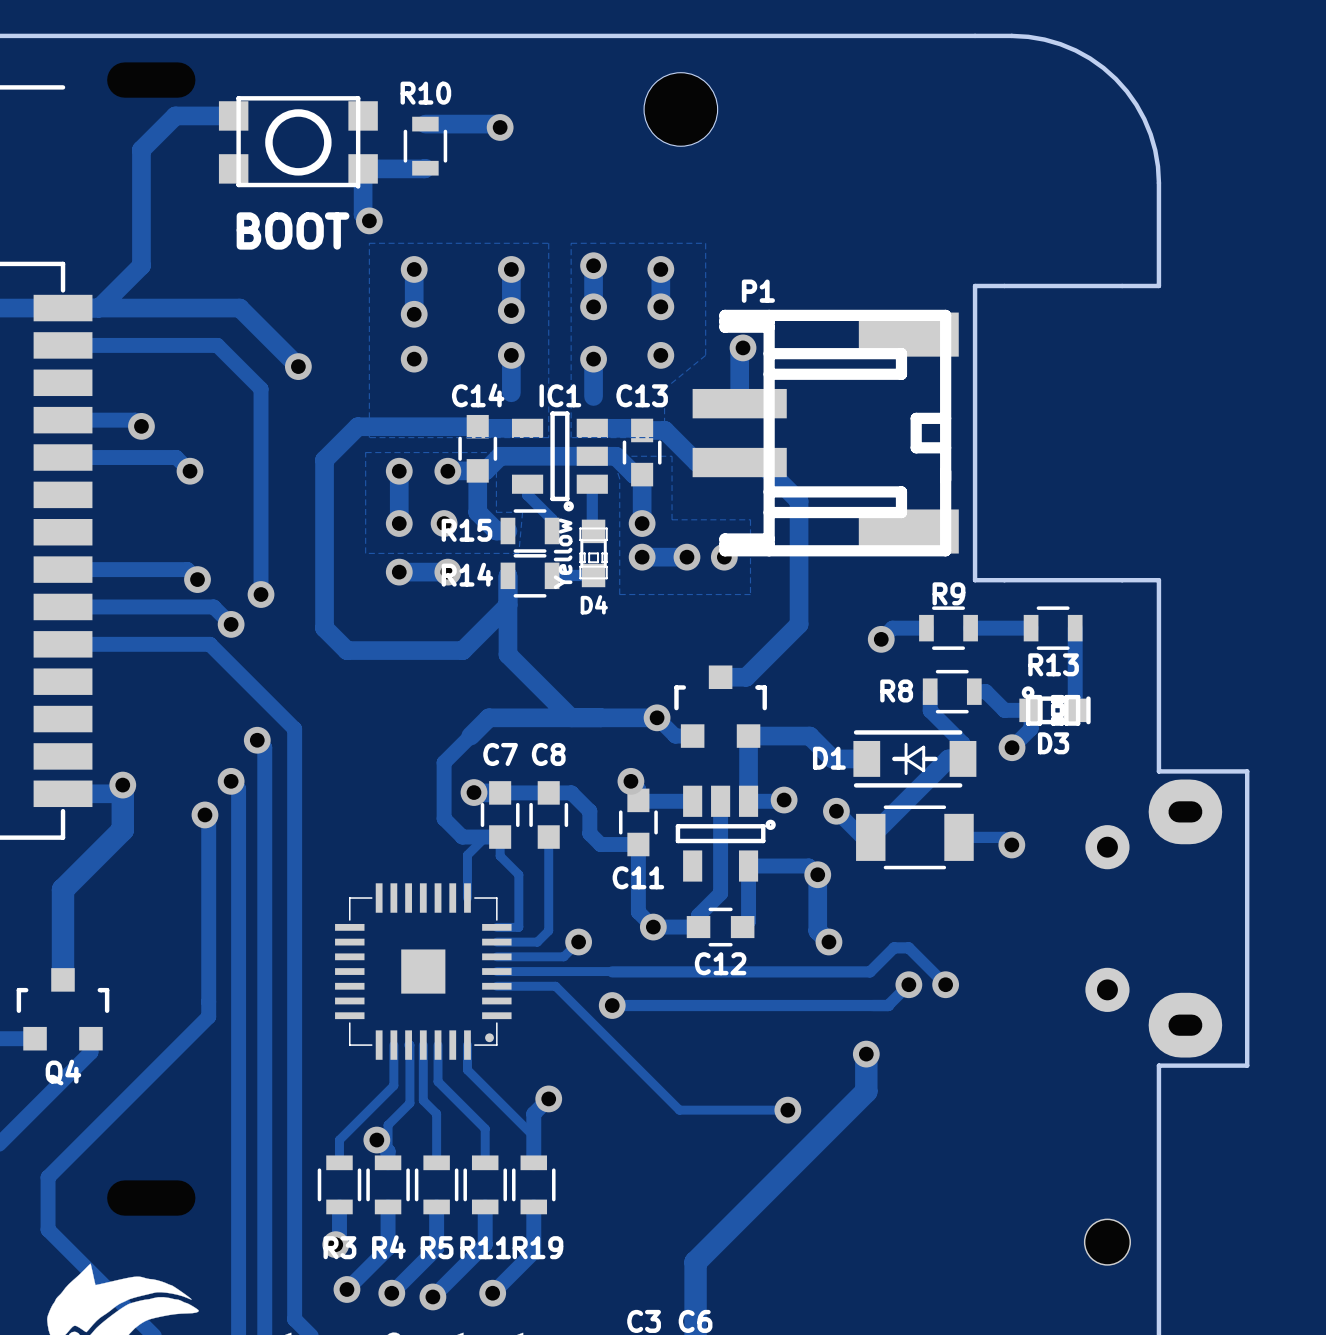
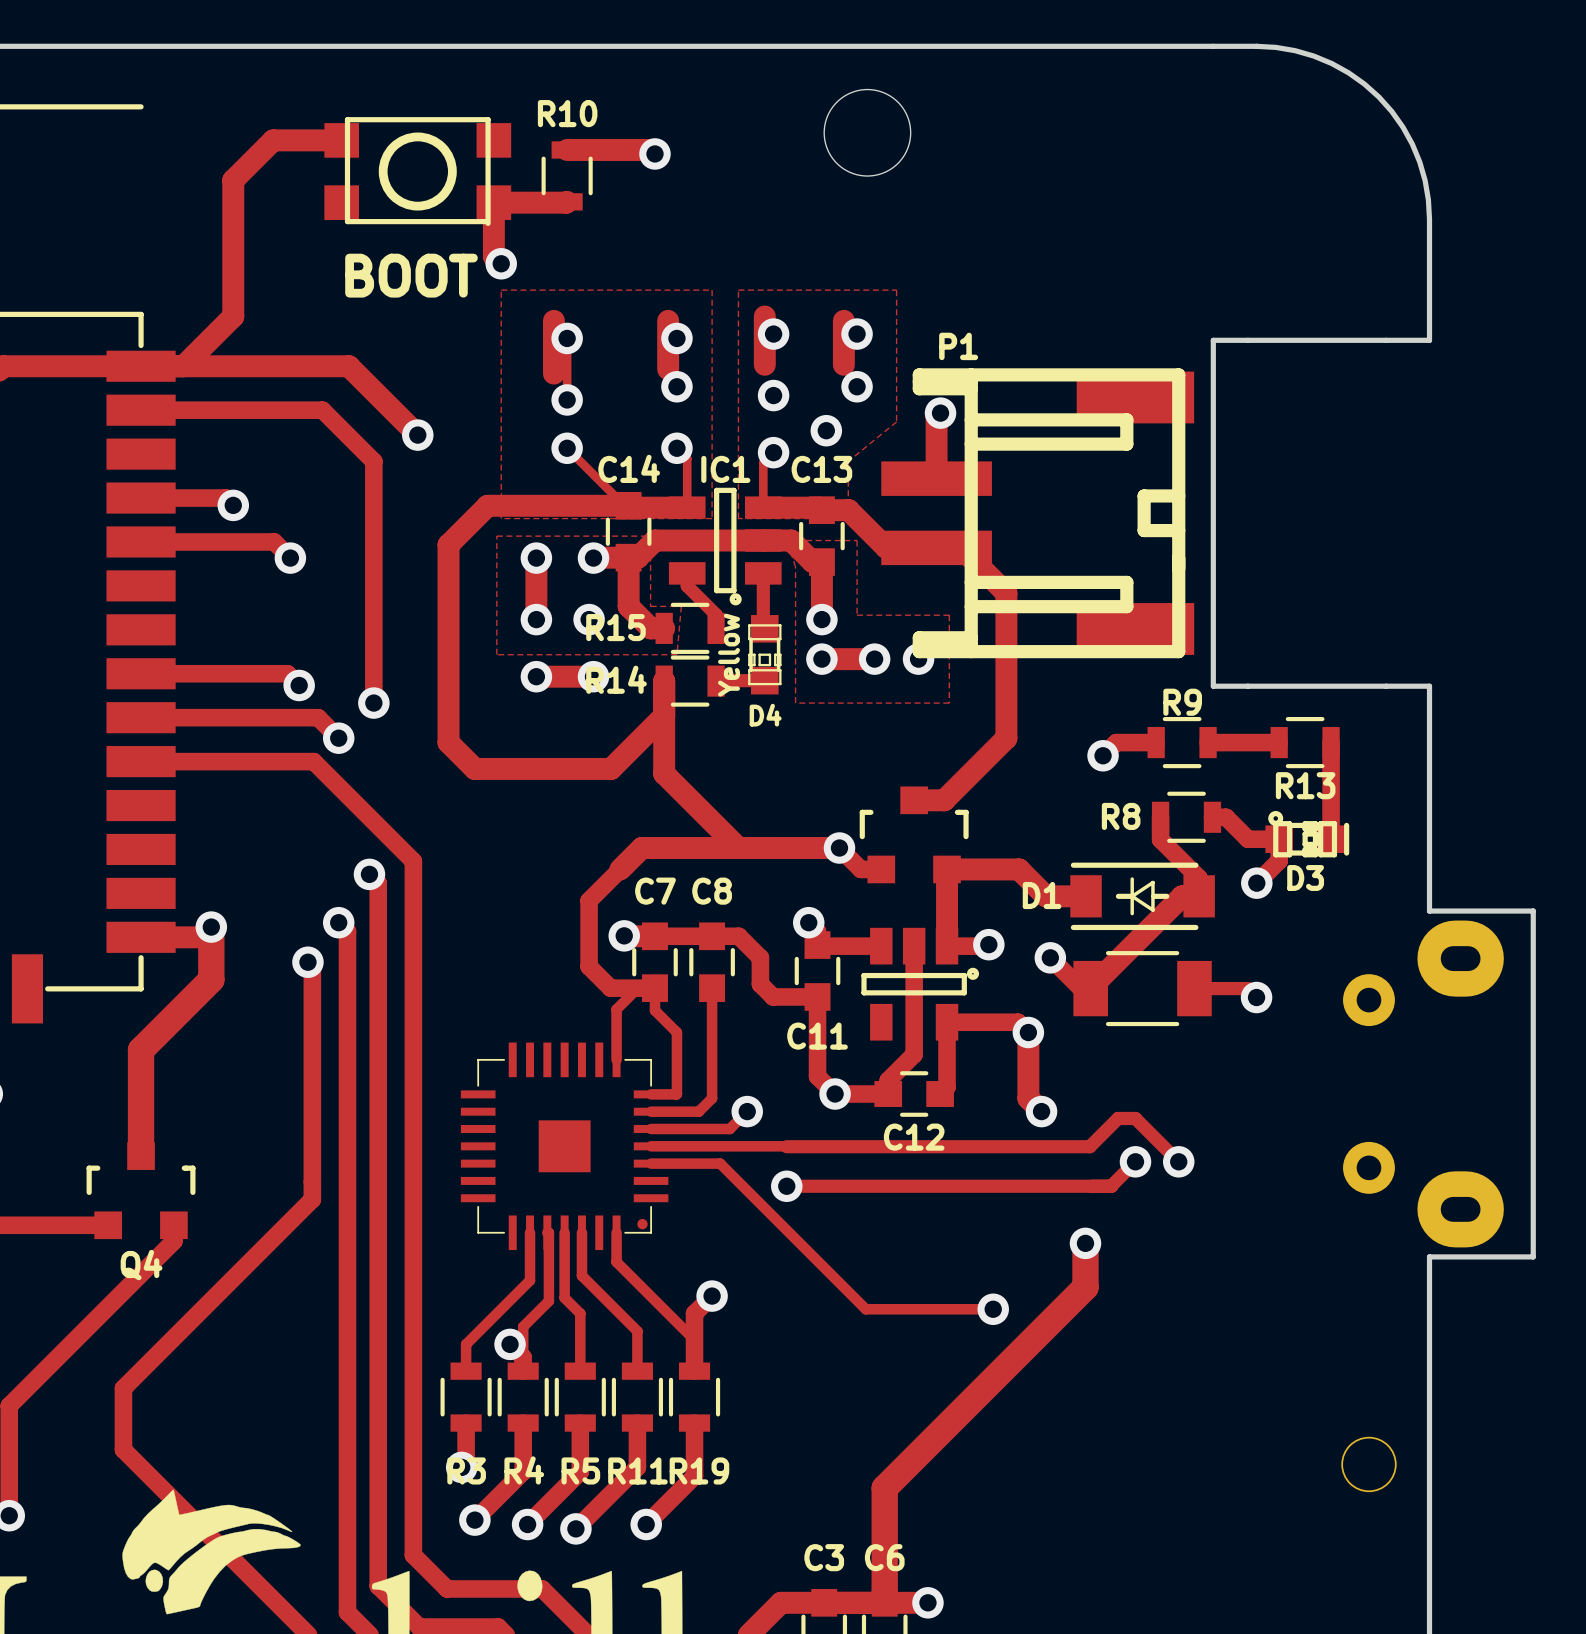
via: (593, 265) -> none
via position: (414, 269) -> (567, 338)
via: (511, 269) -> none
via: (660, 269) -> none
via: none -> (773, 334)
via: none -> (857, 334)
track: none -> (567, 338) (567, 399)
via: none -> (676, 338)
via: (593, 306) -> none
via: (660, 306) -> none
via: (511, 310) -> none
via: (414, 314) -> none
via: none -> (676, 386)
via: none -> (857, 386)
via: none -> (773, 395)
via: none -> (567, 399)
track: (511, 355) (511, 392) -> none
via position: (511, 355) -> (676, 448)
via position: (660, 355) -> (826, 430)
via: (414, 359) -> none
track: (593, 359) (593, 396) -> none
via: (593, 359) -> none
track: none -> (567, 448) (624, 505) (628, 505)
via: none -> (567, 448)
track: none -> (676, 448) (687, 458) (687, 507)
track: none -> (773, 452) (763, 462) (763, 507)
via: none -> (773, 452)

